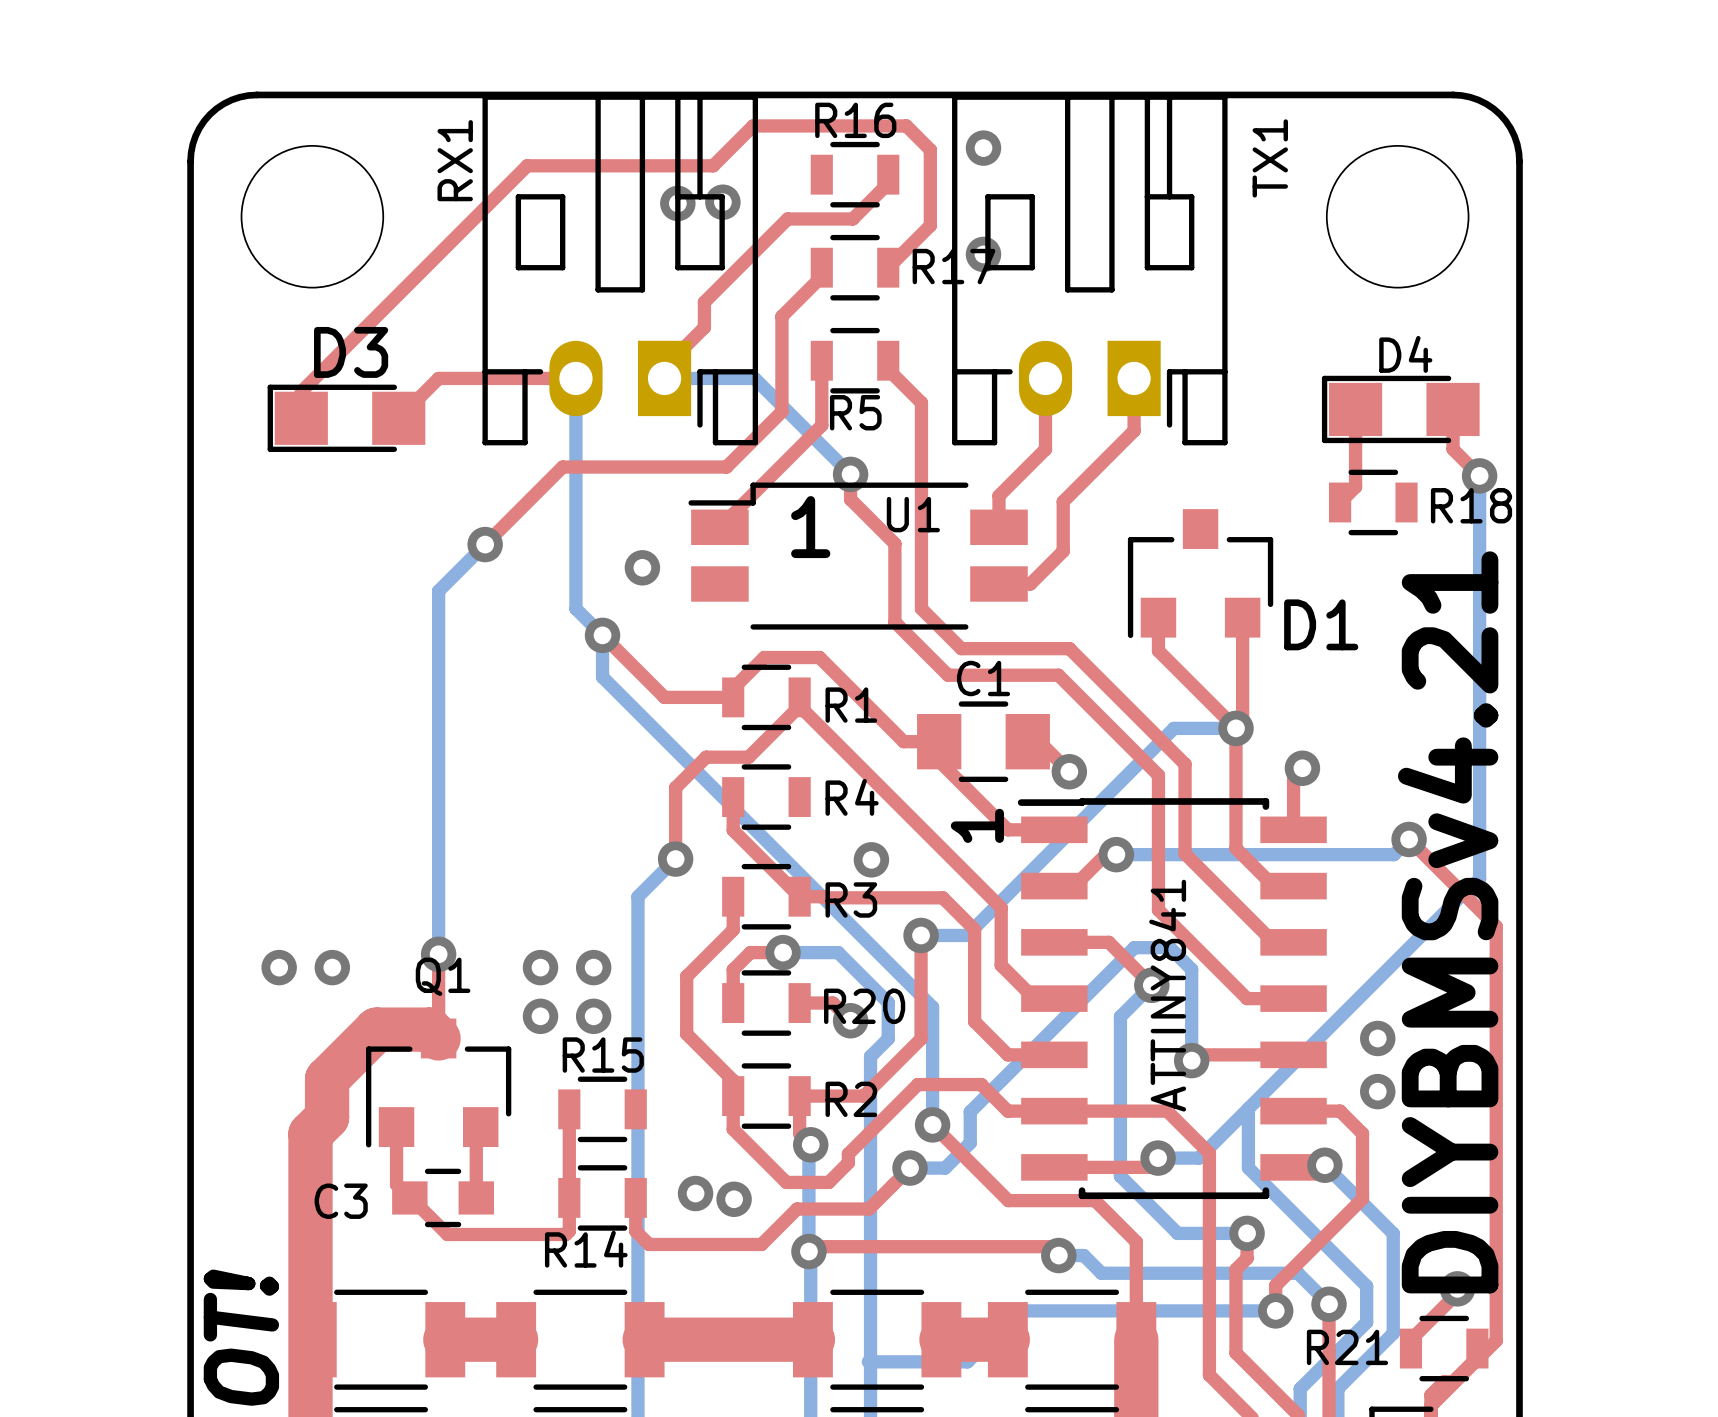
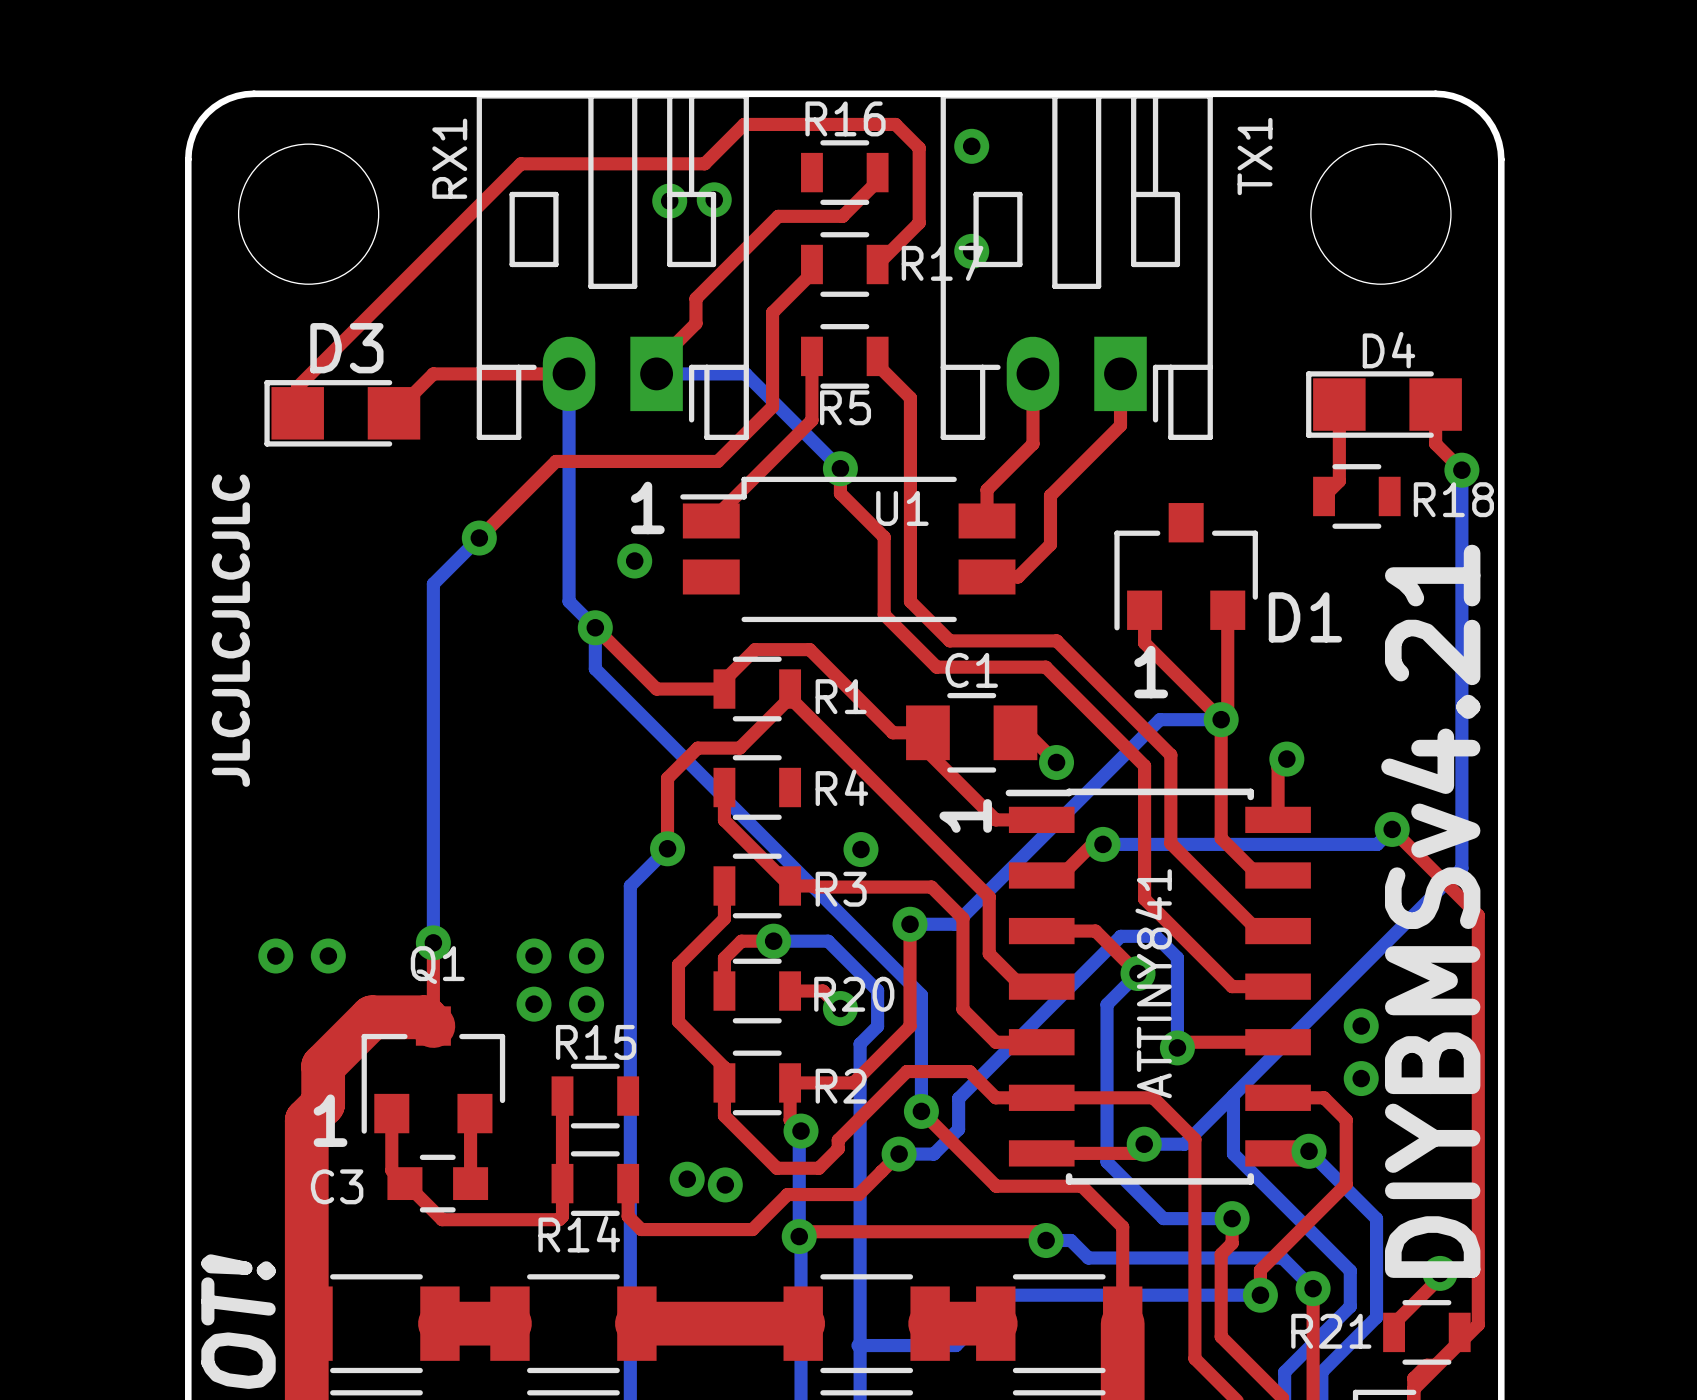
text position: 1 (810, 527) -> 1 (647, 507)
text: none -> JLCJLCJLCJLC (230, 630)
text: none -> 1 (1151, 672)
text: none -> 1 (330, 1120)

